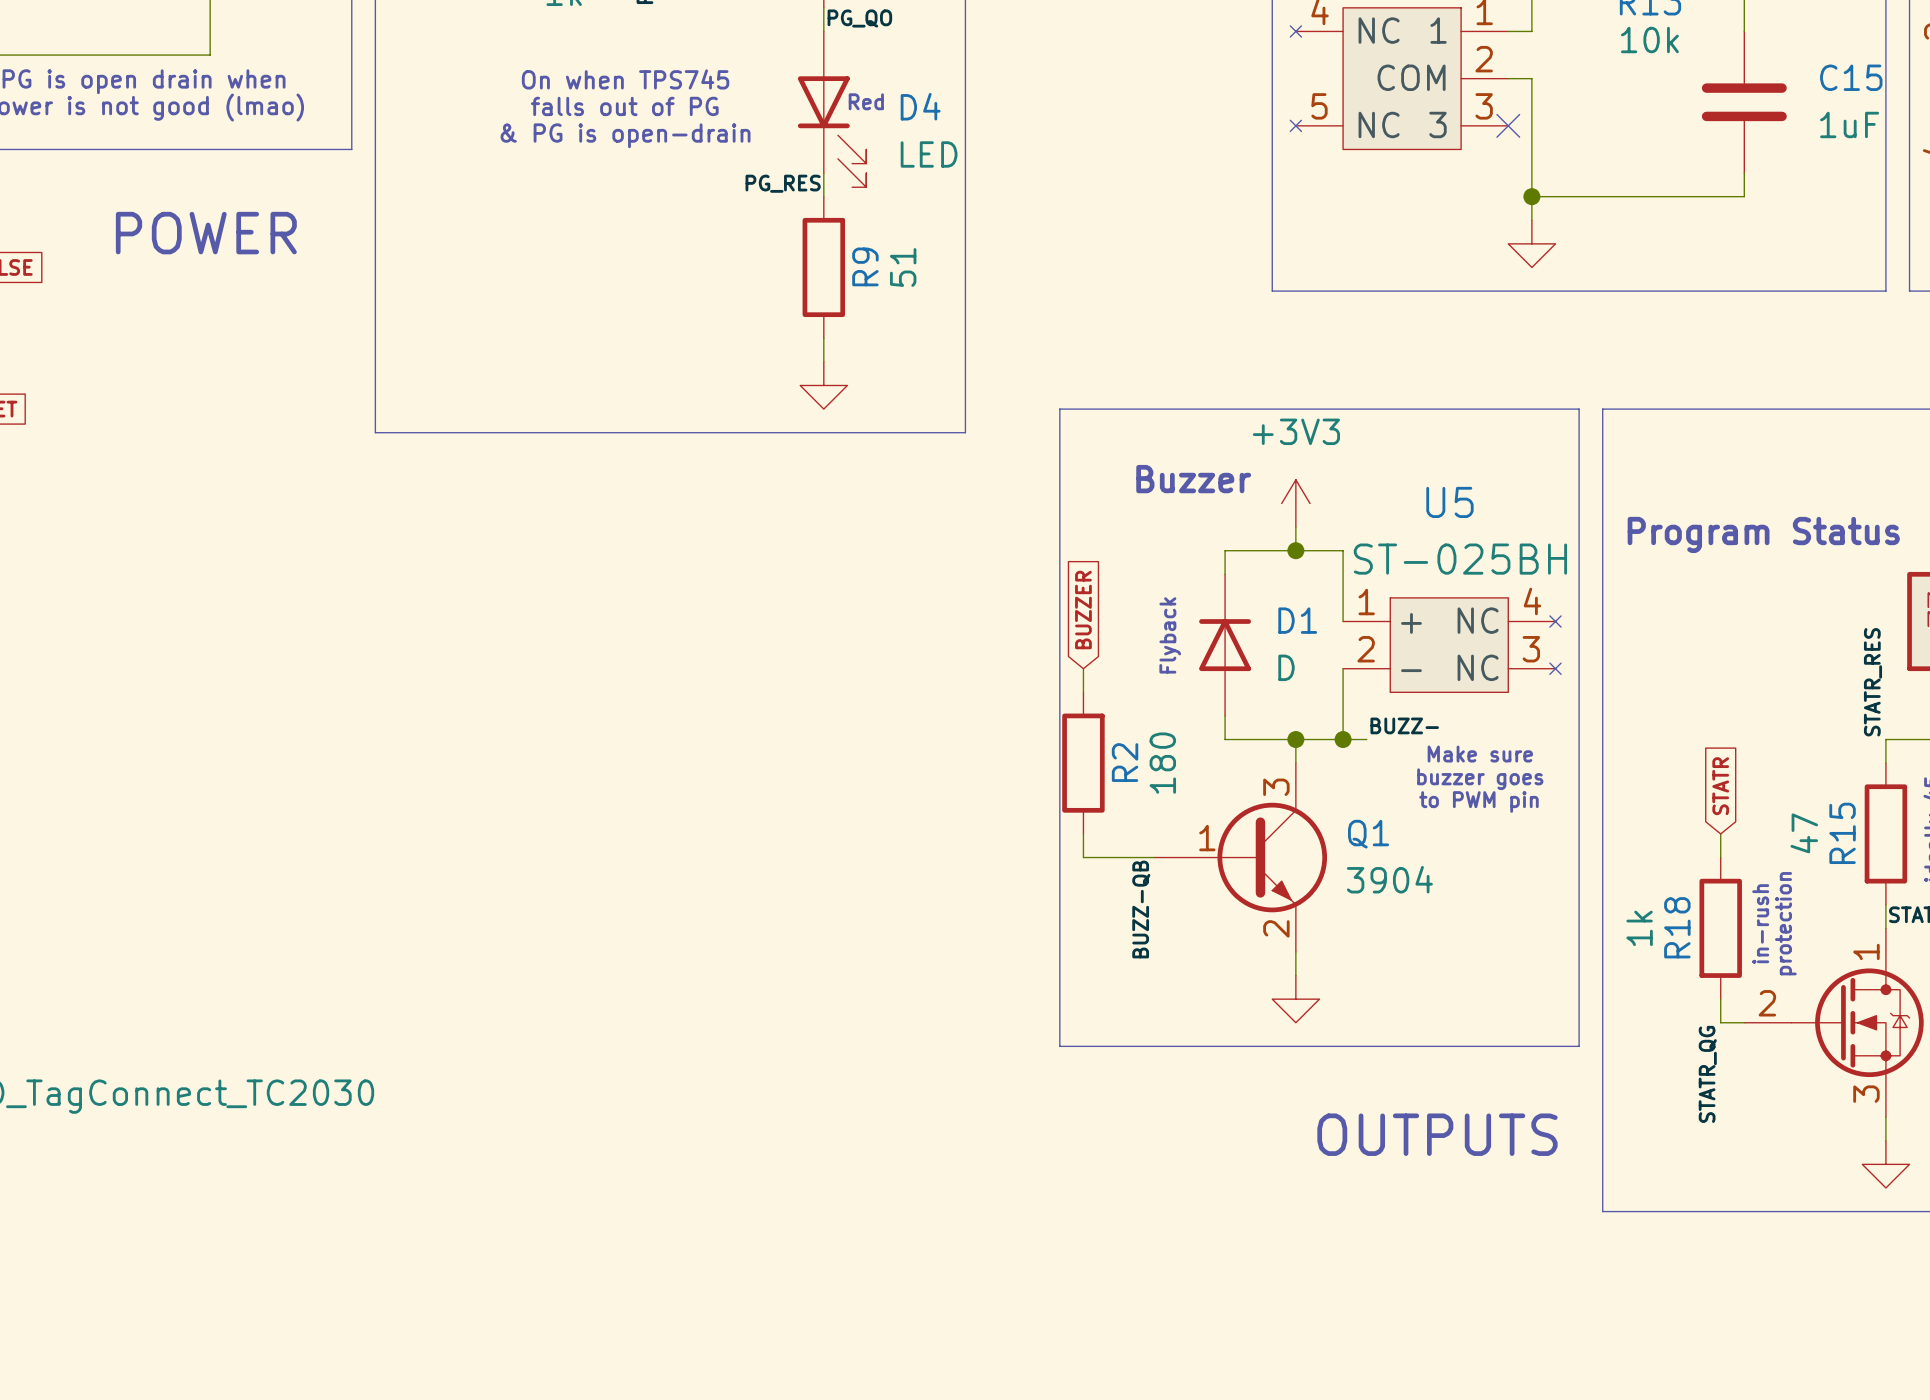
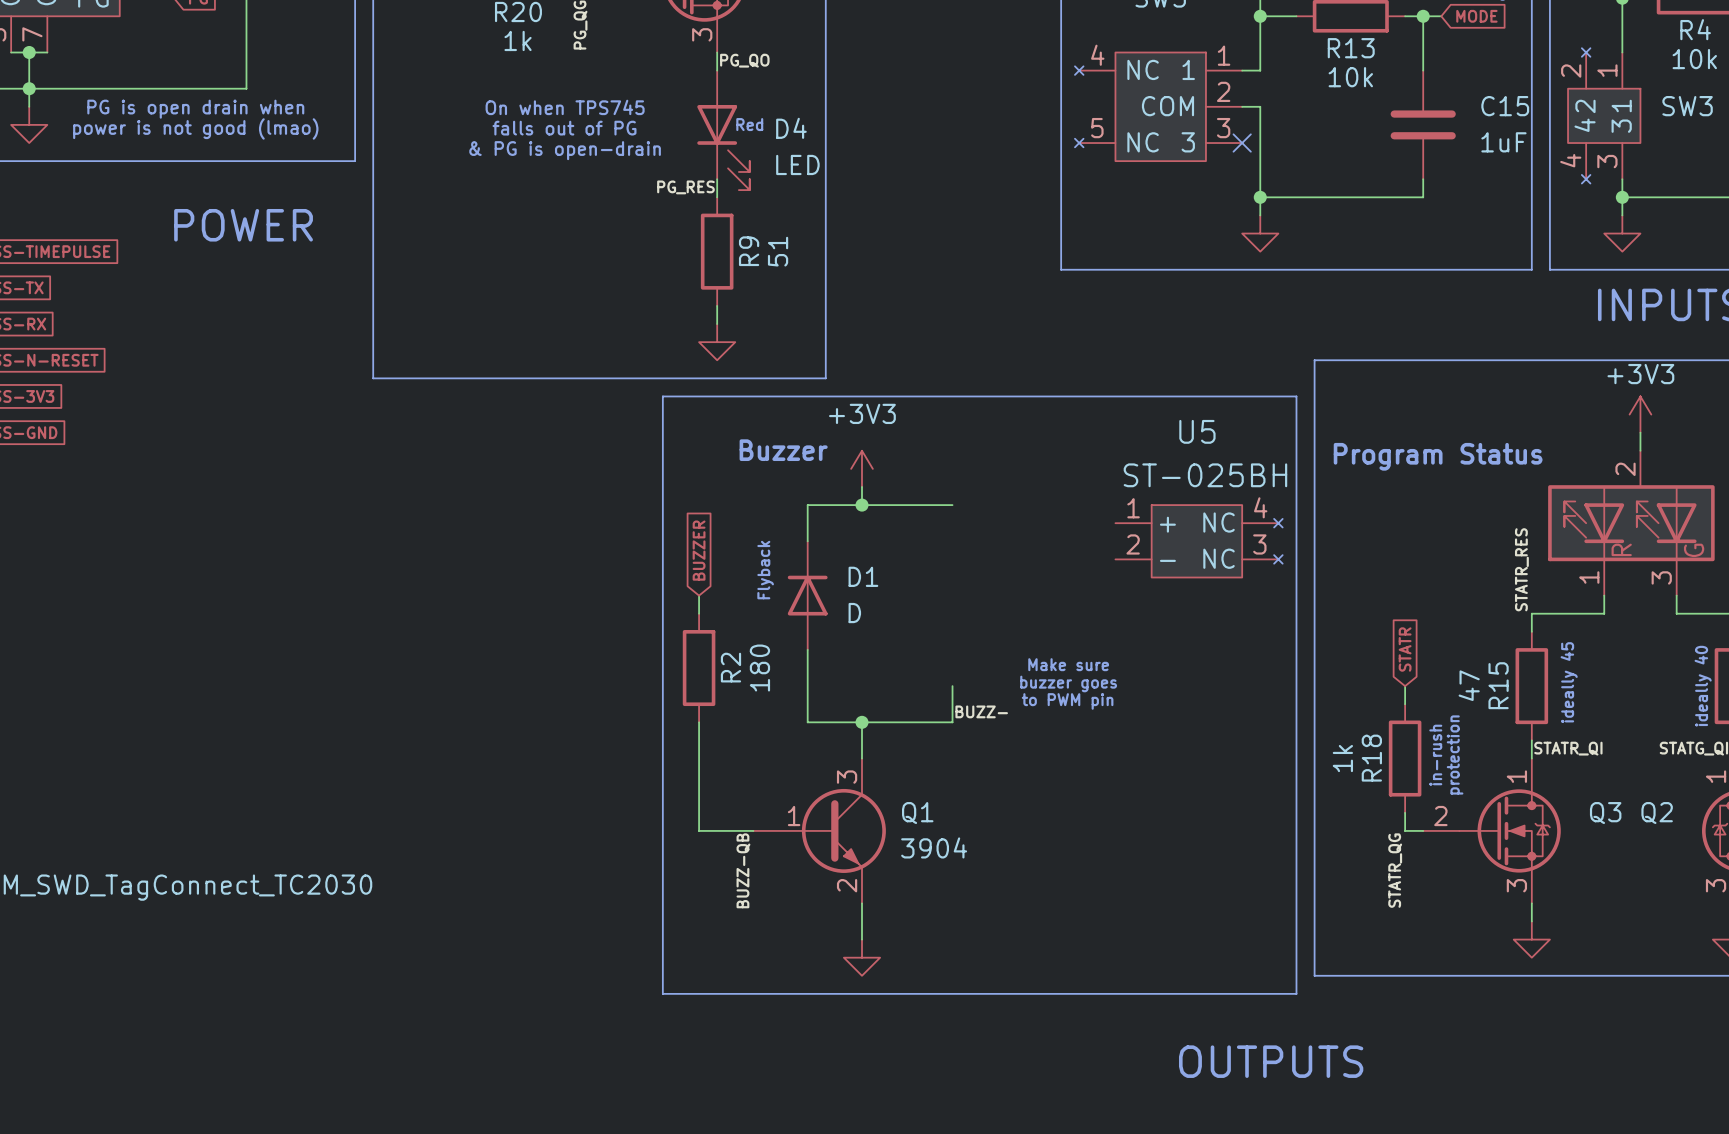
line: (1579, 456) (1579, 409) (1059, 409) (1059, 1046) (1579, 1046) -> (1296, 396) (662, 396) (662, 993) (1296, 993) (1296, 849)
text position: Buzzer (1193, 479) -> Buzzer (783, 450)
power symbol position: +3V3 (1295, 503) -> +3V3 (862, 468)
wire: (1295, 527) (1295, 550) -> (862, 486) (862, 505)
junction: (1295, 550) -> none
wire: (1225, 574) (1225, 550) (1343, 550) (1343, 621) -> none
junction: none -> (862, 505)
wire: none -> (952, 505) (807, 505) (807, 541)
global label position: BUZZER (1083, 610) -> BUZZER (699, 550)
text position: Flyback (1170, 635) -> Flyback (765, 570)
D1 position: (1225, 645) -> (807, 595)
wire: (1083, 668) (1083, 692) -> (699, 595) (699, 613)
wire: (1343, 668) (1343, 739) -> none
wire: (1225, 715) (1225, 739) (1366, 739) -> none
label position: BUZZ- (1404, 725) -> BUZZ- (981, 711)
wire: (1295, 739) (1295, 763) -> none
junction: (1295, 739) -> none
junction: (1343, 739) -> none
text position: Make sure (1480, 754) -> Make sure (1068, 664)
R2 position: (1083, 763) -> (699, 668)
text position: buzzer goes (1480, 779) -> buzzer goes (1068, 683)
wire: none -> (807, 649) (807, 722) (952, 722) (952, 686)
text position: to PWM pin (1478, 801) -> to PWM pin (1067, 701)
wire: (1083, 833) (1083, 857) (1154, 857) -> none
Q1 position: (1240, 857) -> (819, 830)
wire: none -> (699, 722) (699, 830) (753, 830)
wire: none -> (862, 722) (862, 758)
junction: none -> (862, 722)
label position: BUZZ-QB (1141, 909) -> BUZZ-QB (743, 870)
wire: (1295, 951) (1295, 975) -> none
power symbol position: (1295, 999) -> (862, 957)
wire: none -> (862, 903) (862, 939)
text position: OUTPUTS (1437, 1134) -> OUTPUTS (1271, 1061)

